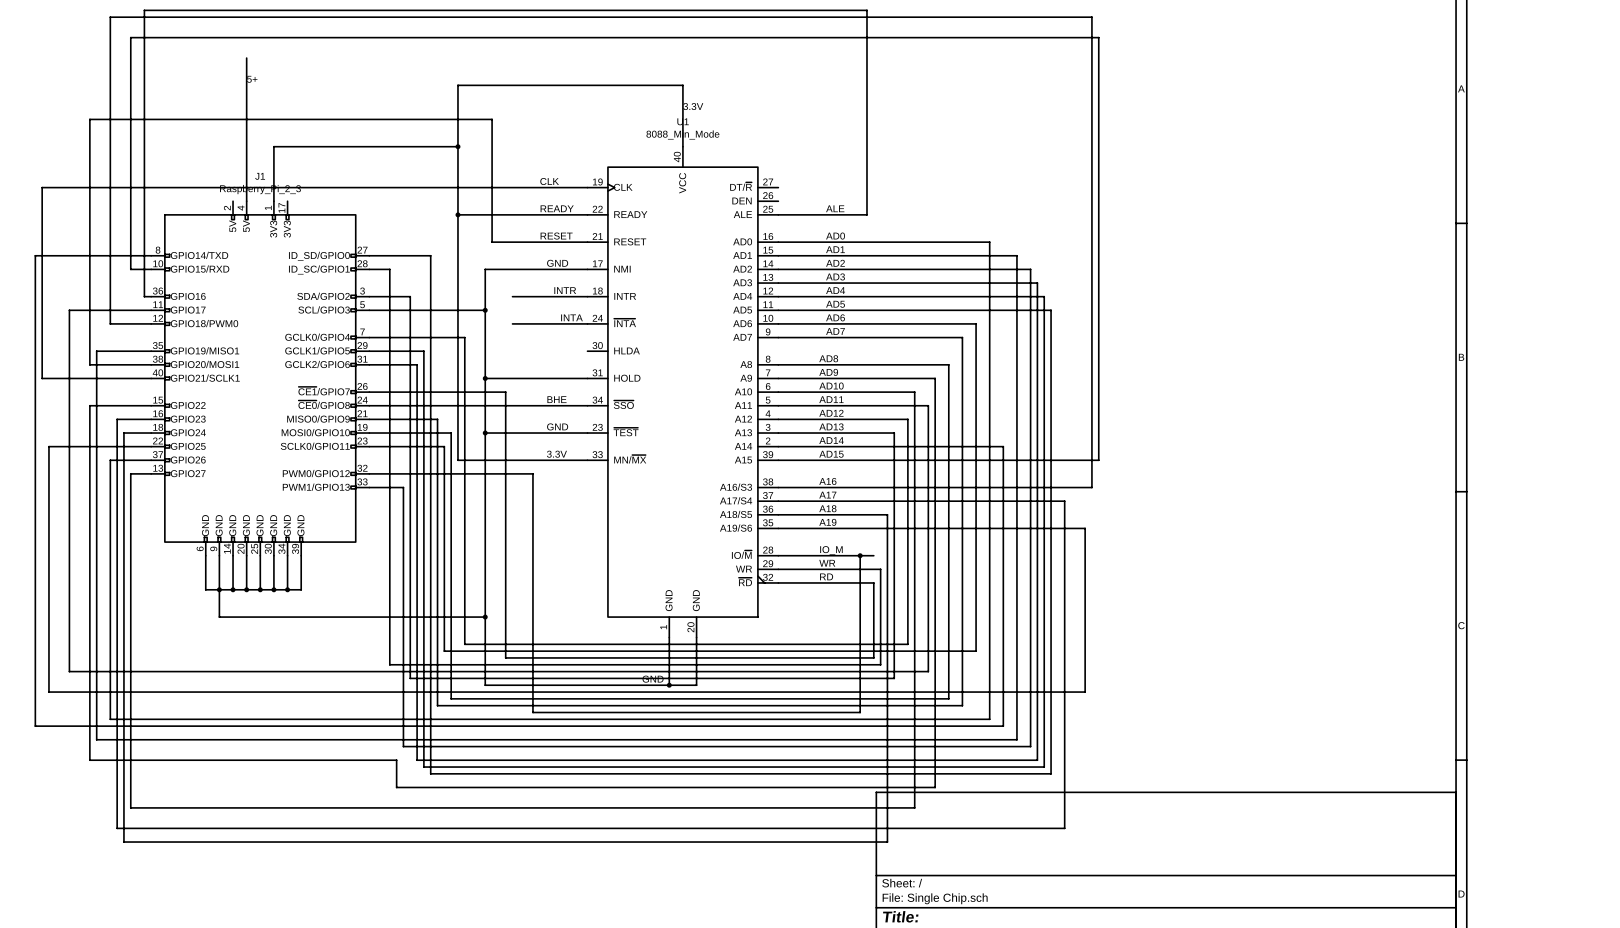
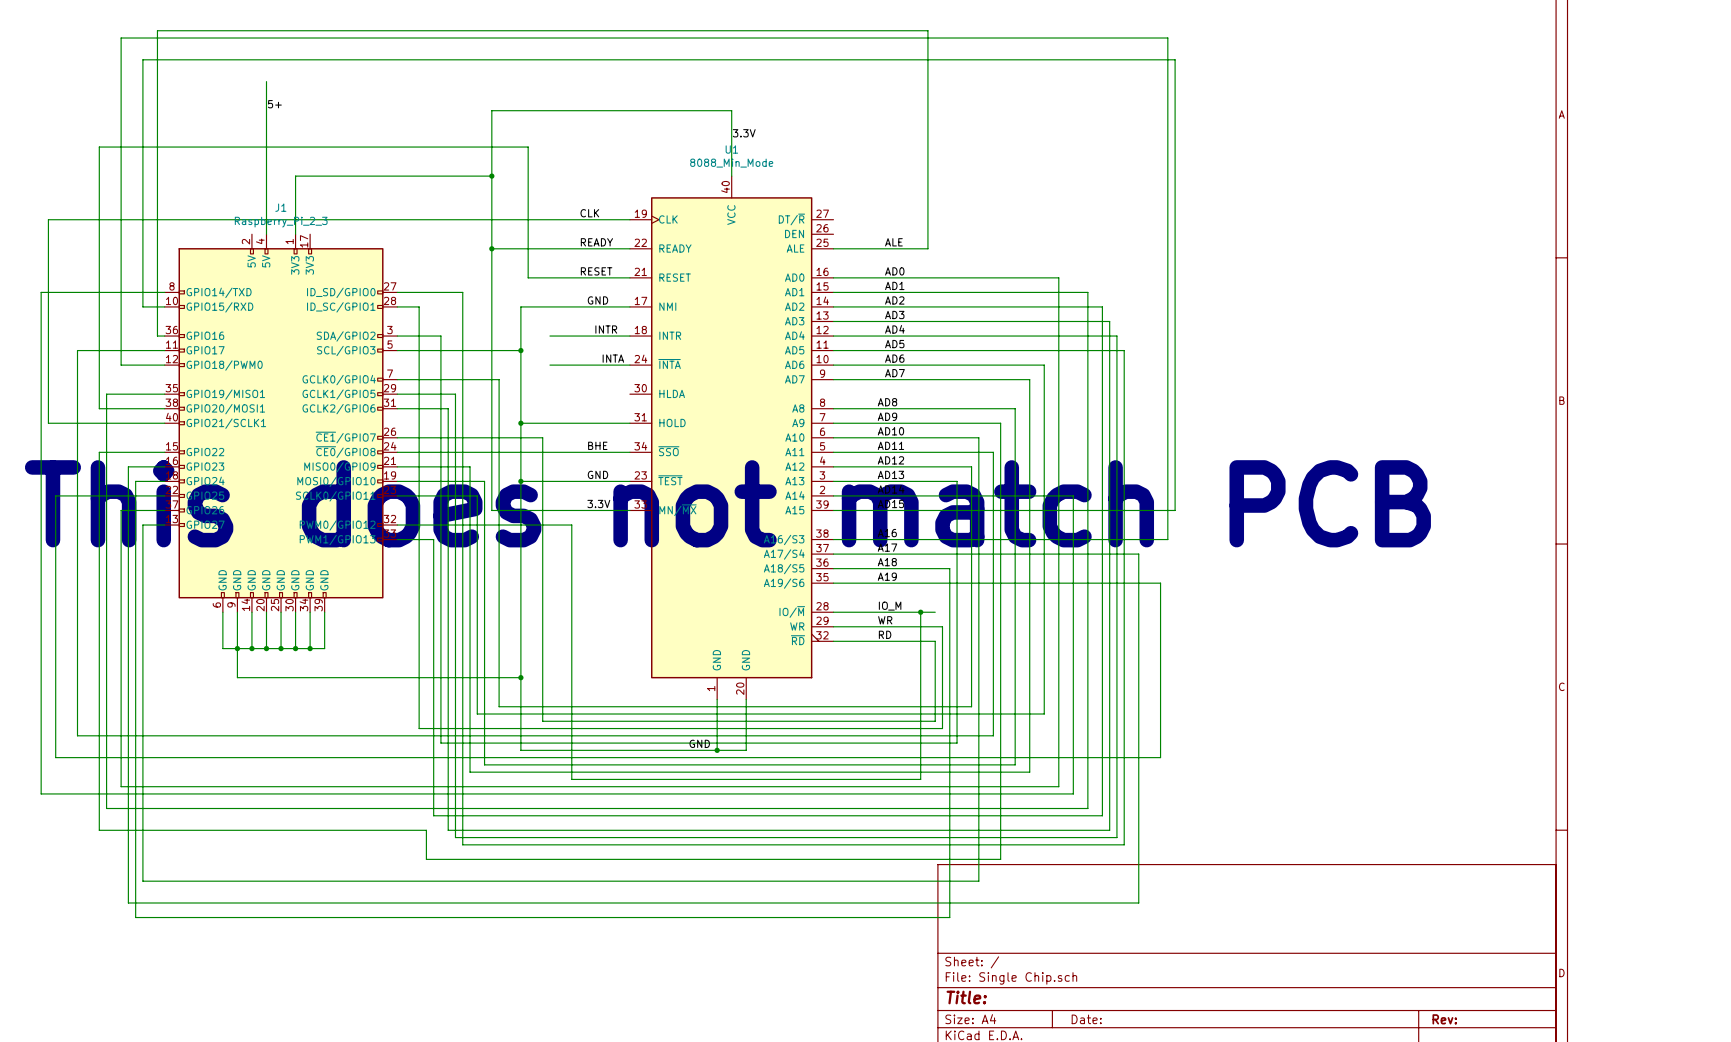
text: none -> This does not match PCB (727, 503)

